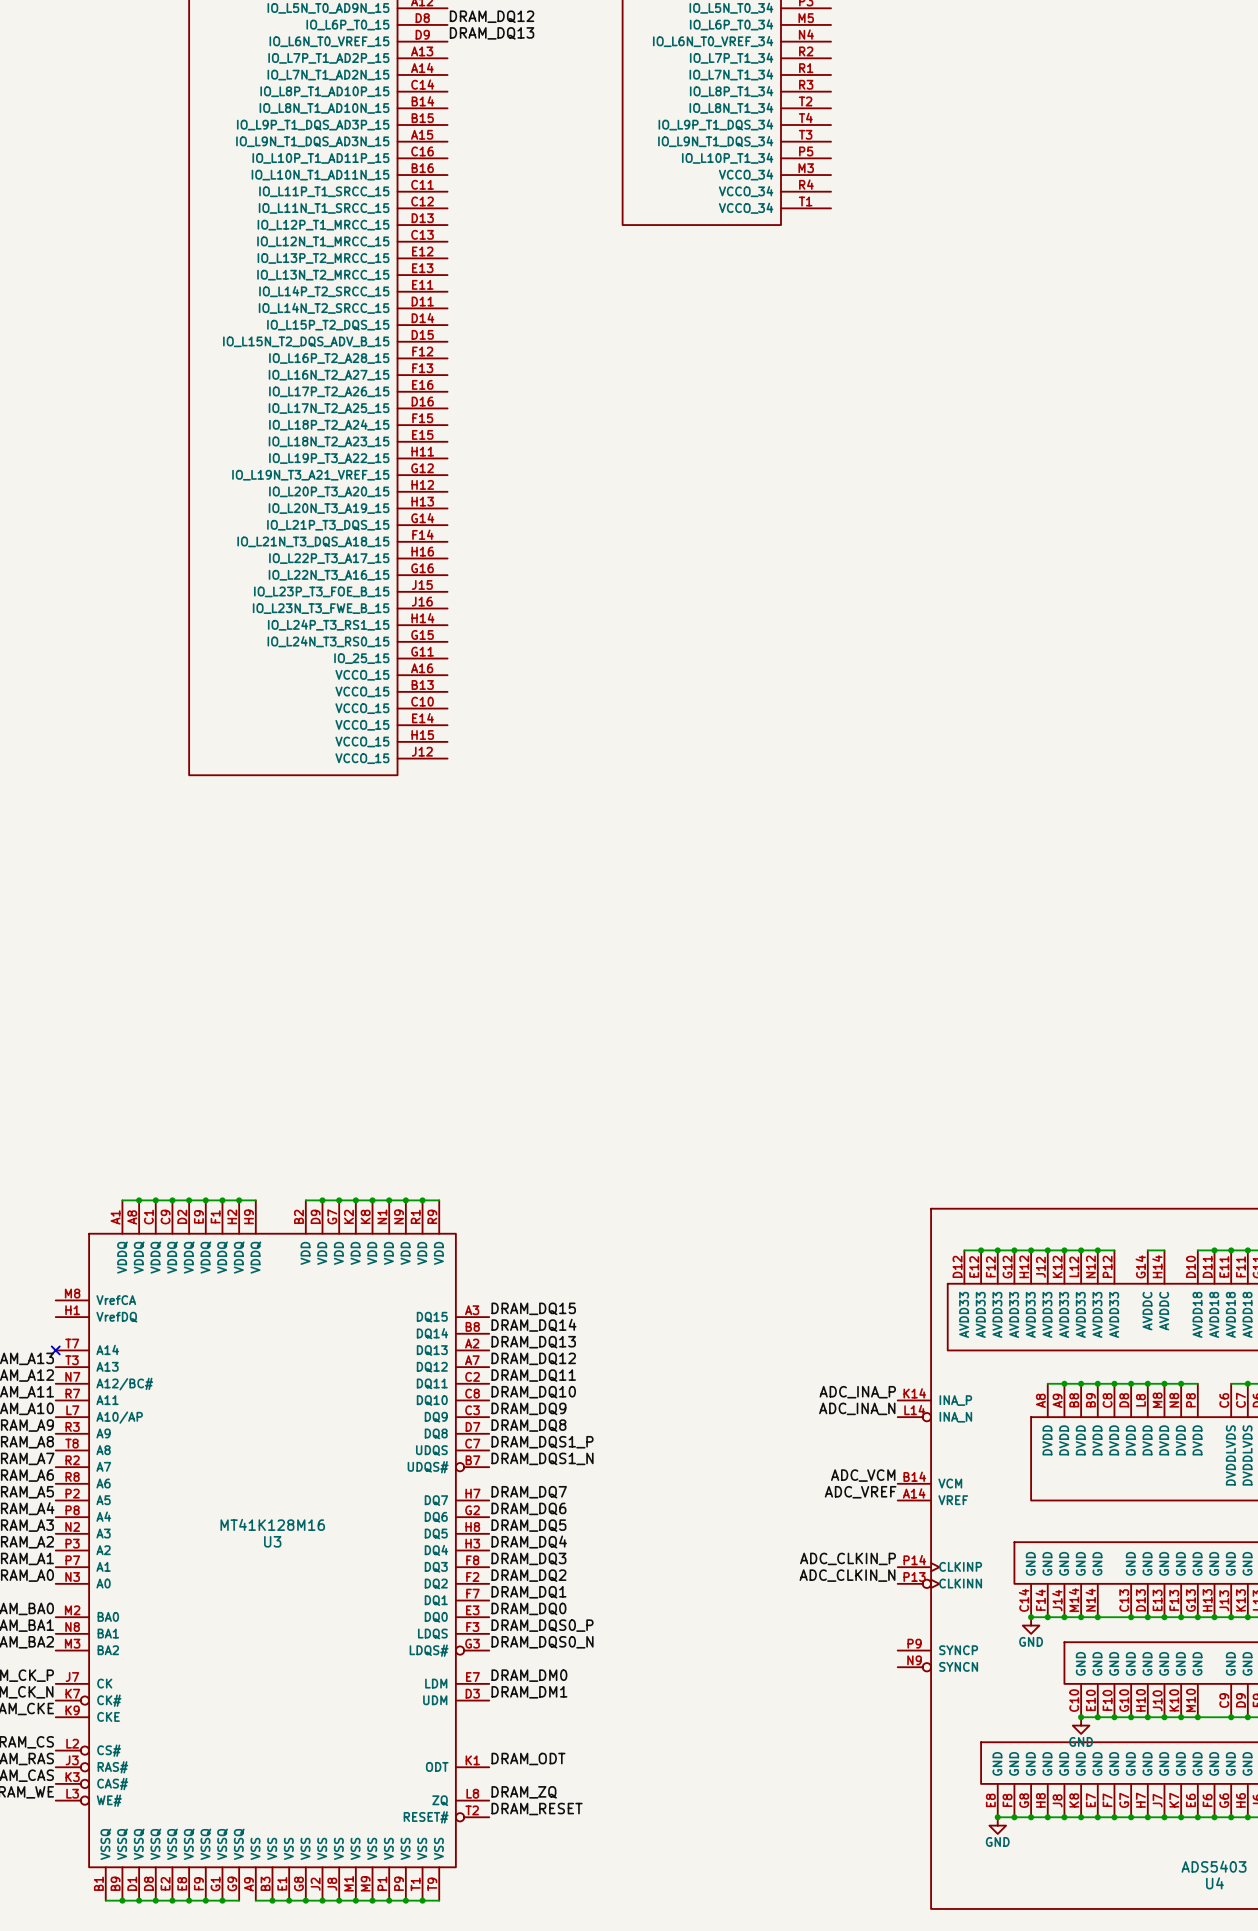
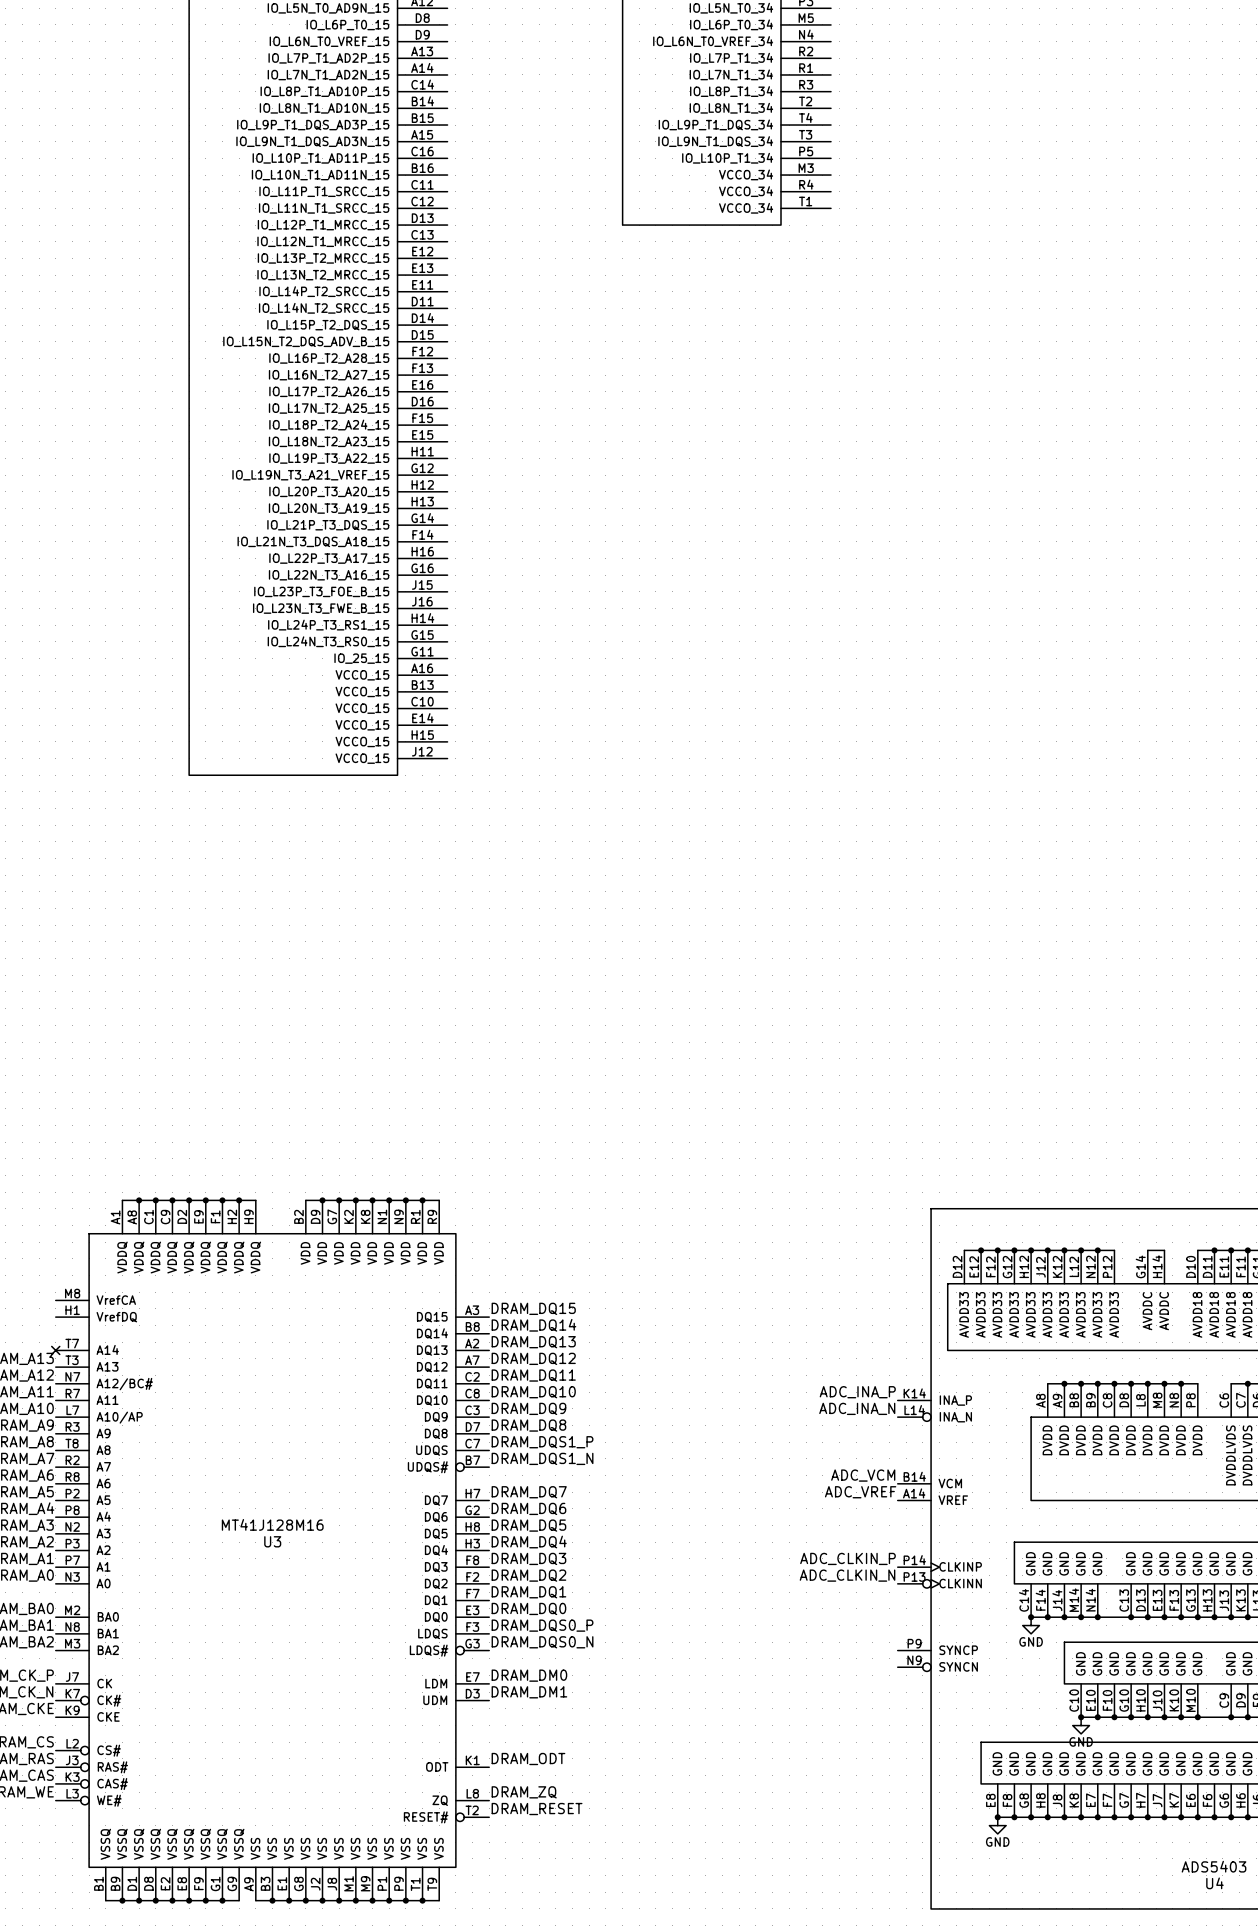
label: DRAM_DQ12 (492, 16) -> none
label: DRAM_DQ13 (492, 33) -> none
U3 value: MT41K128M16 (272, 1524) -> MT41J128M16 (272, 1524)

